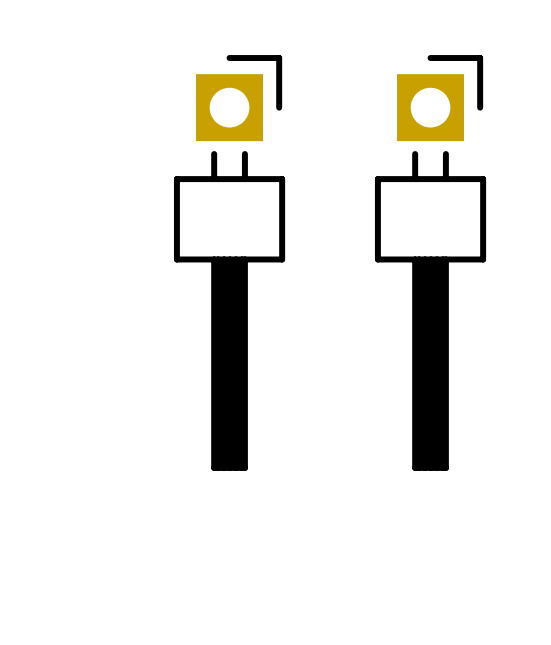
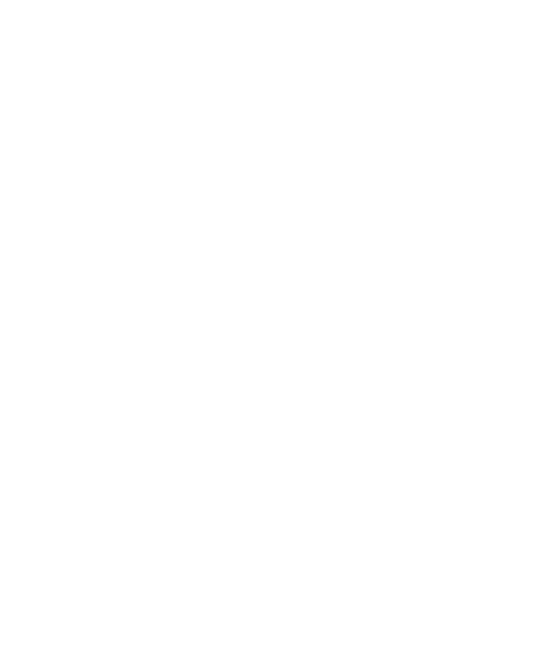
part: (229, 262) -> none
part: (430, 262) -> none

